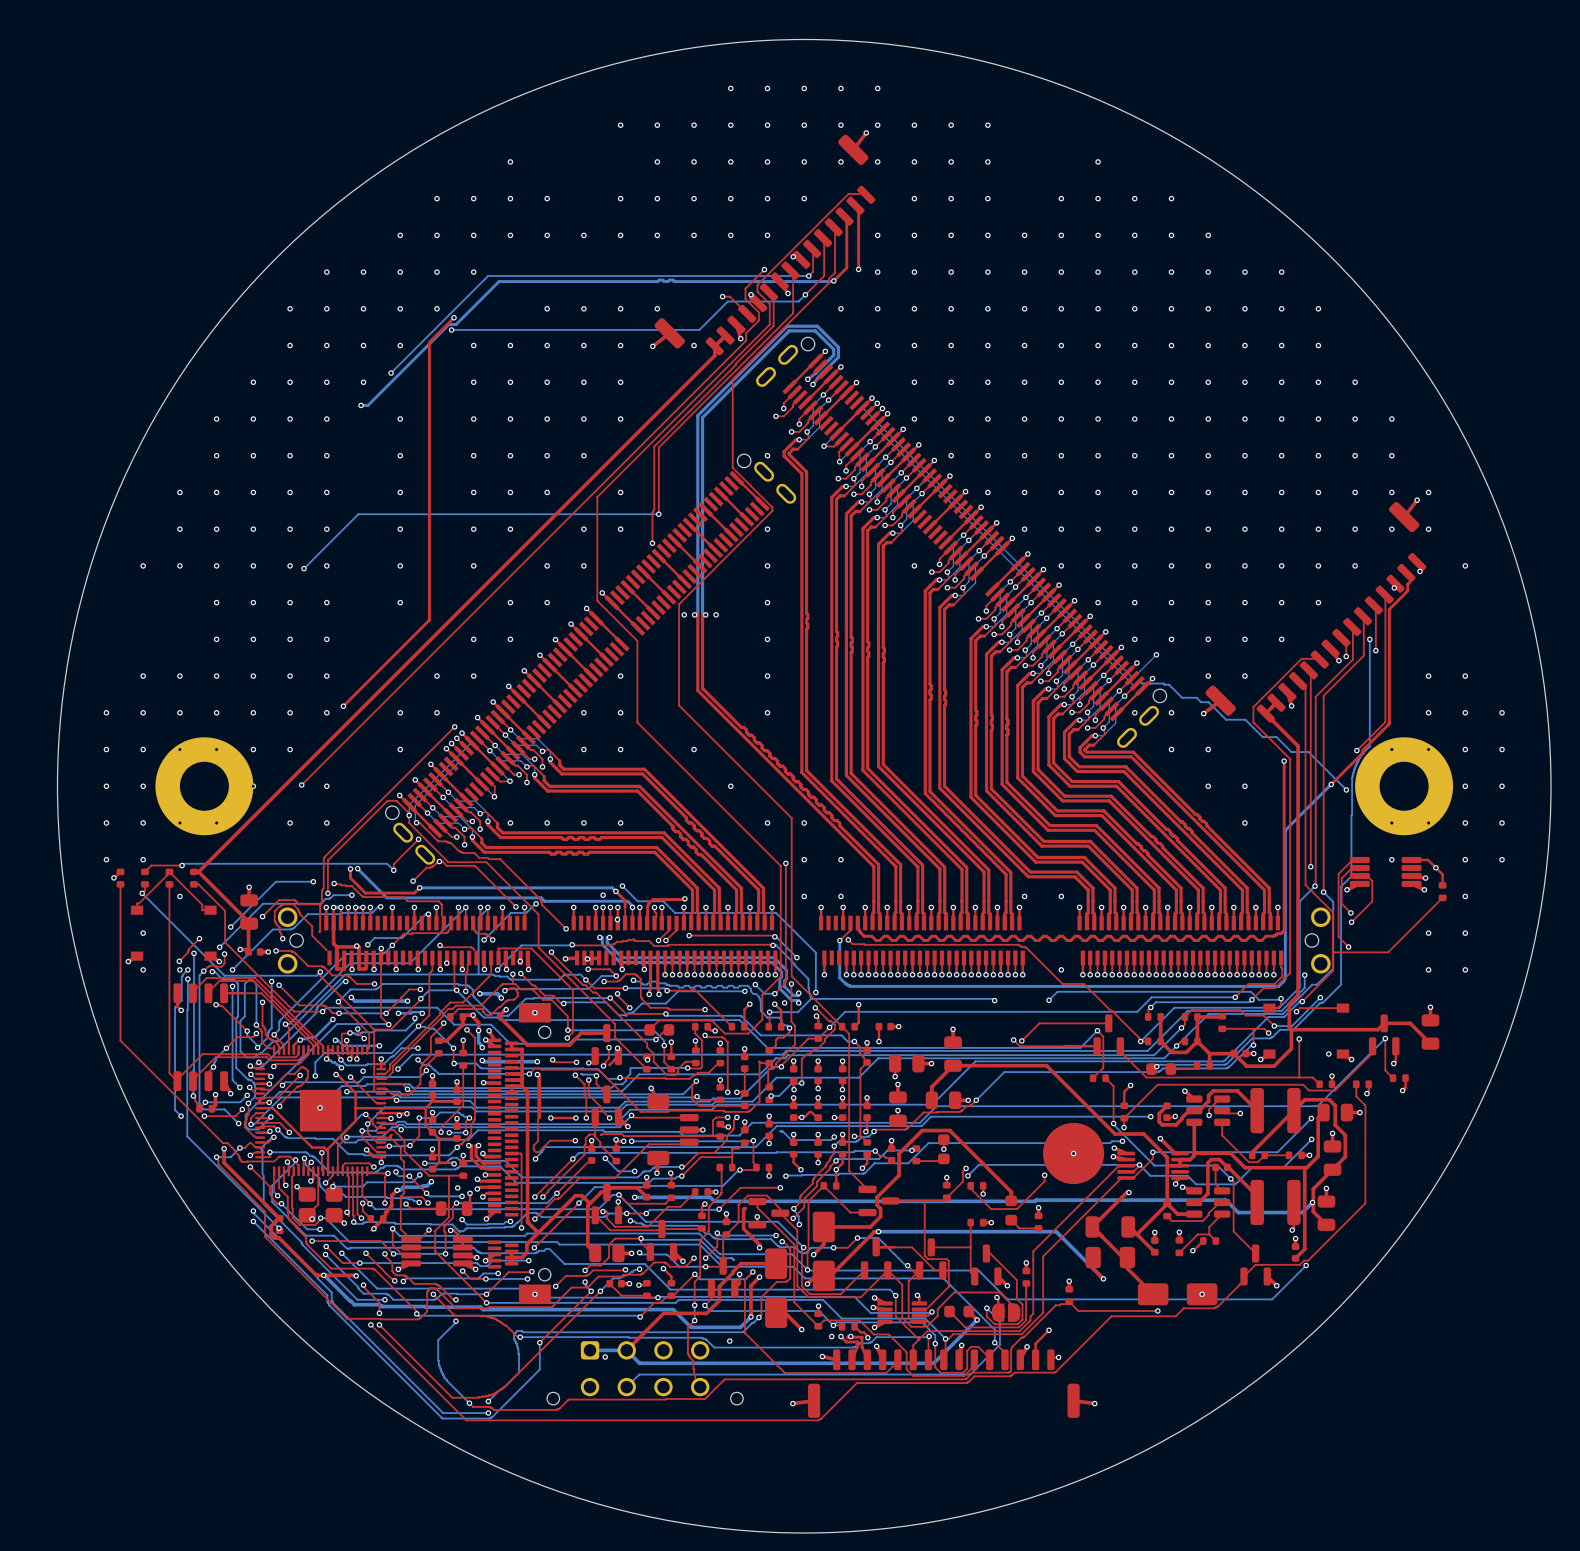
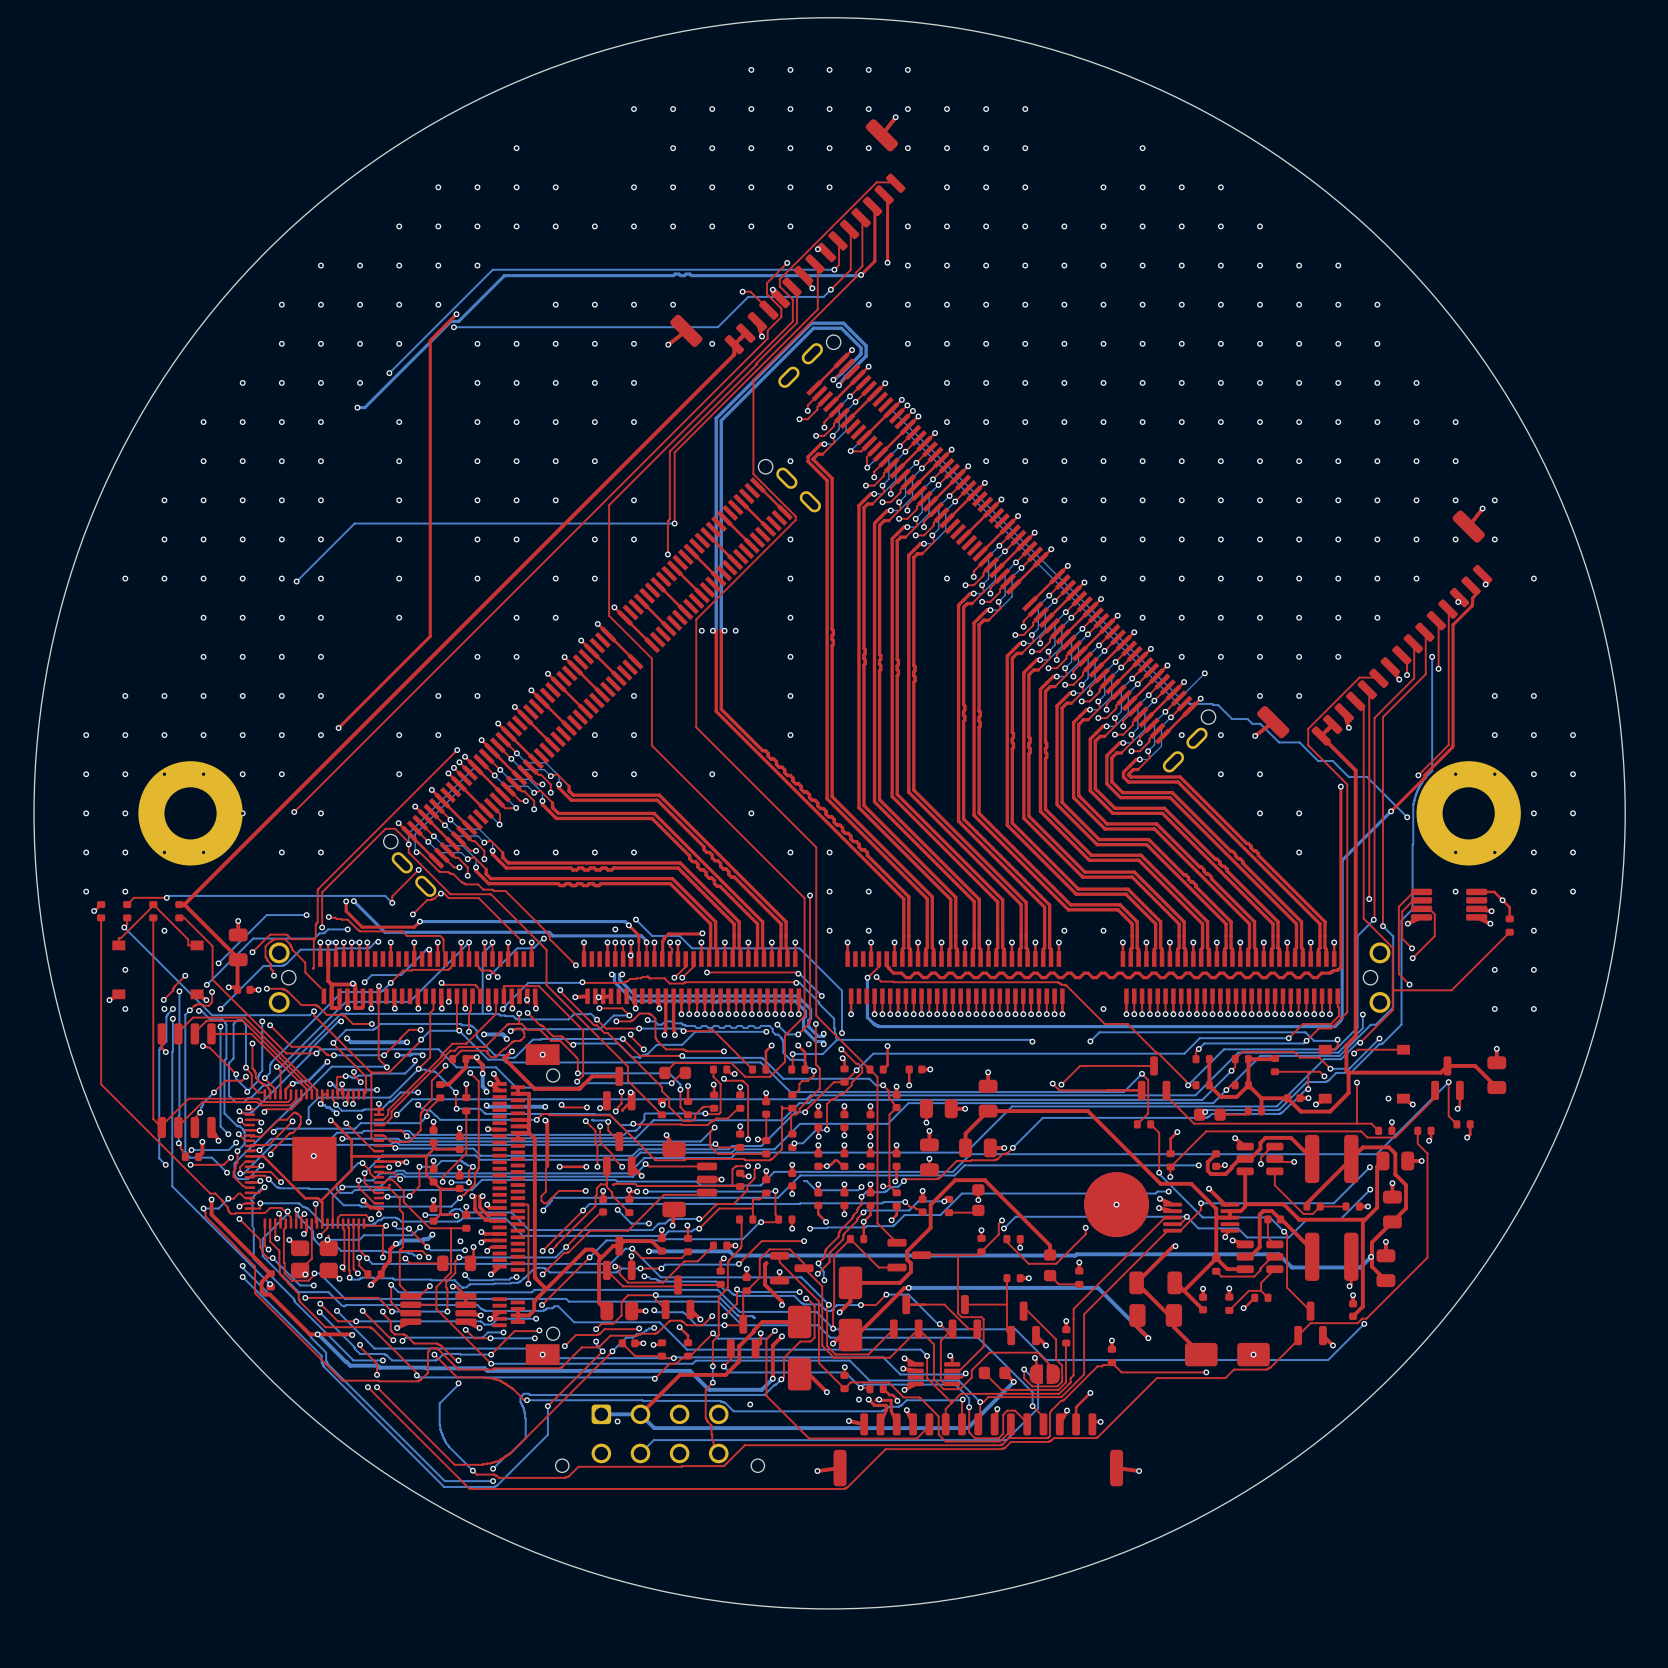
via: (485, 1174) -> none

